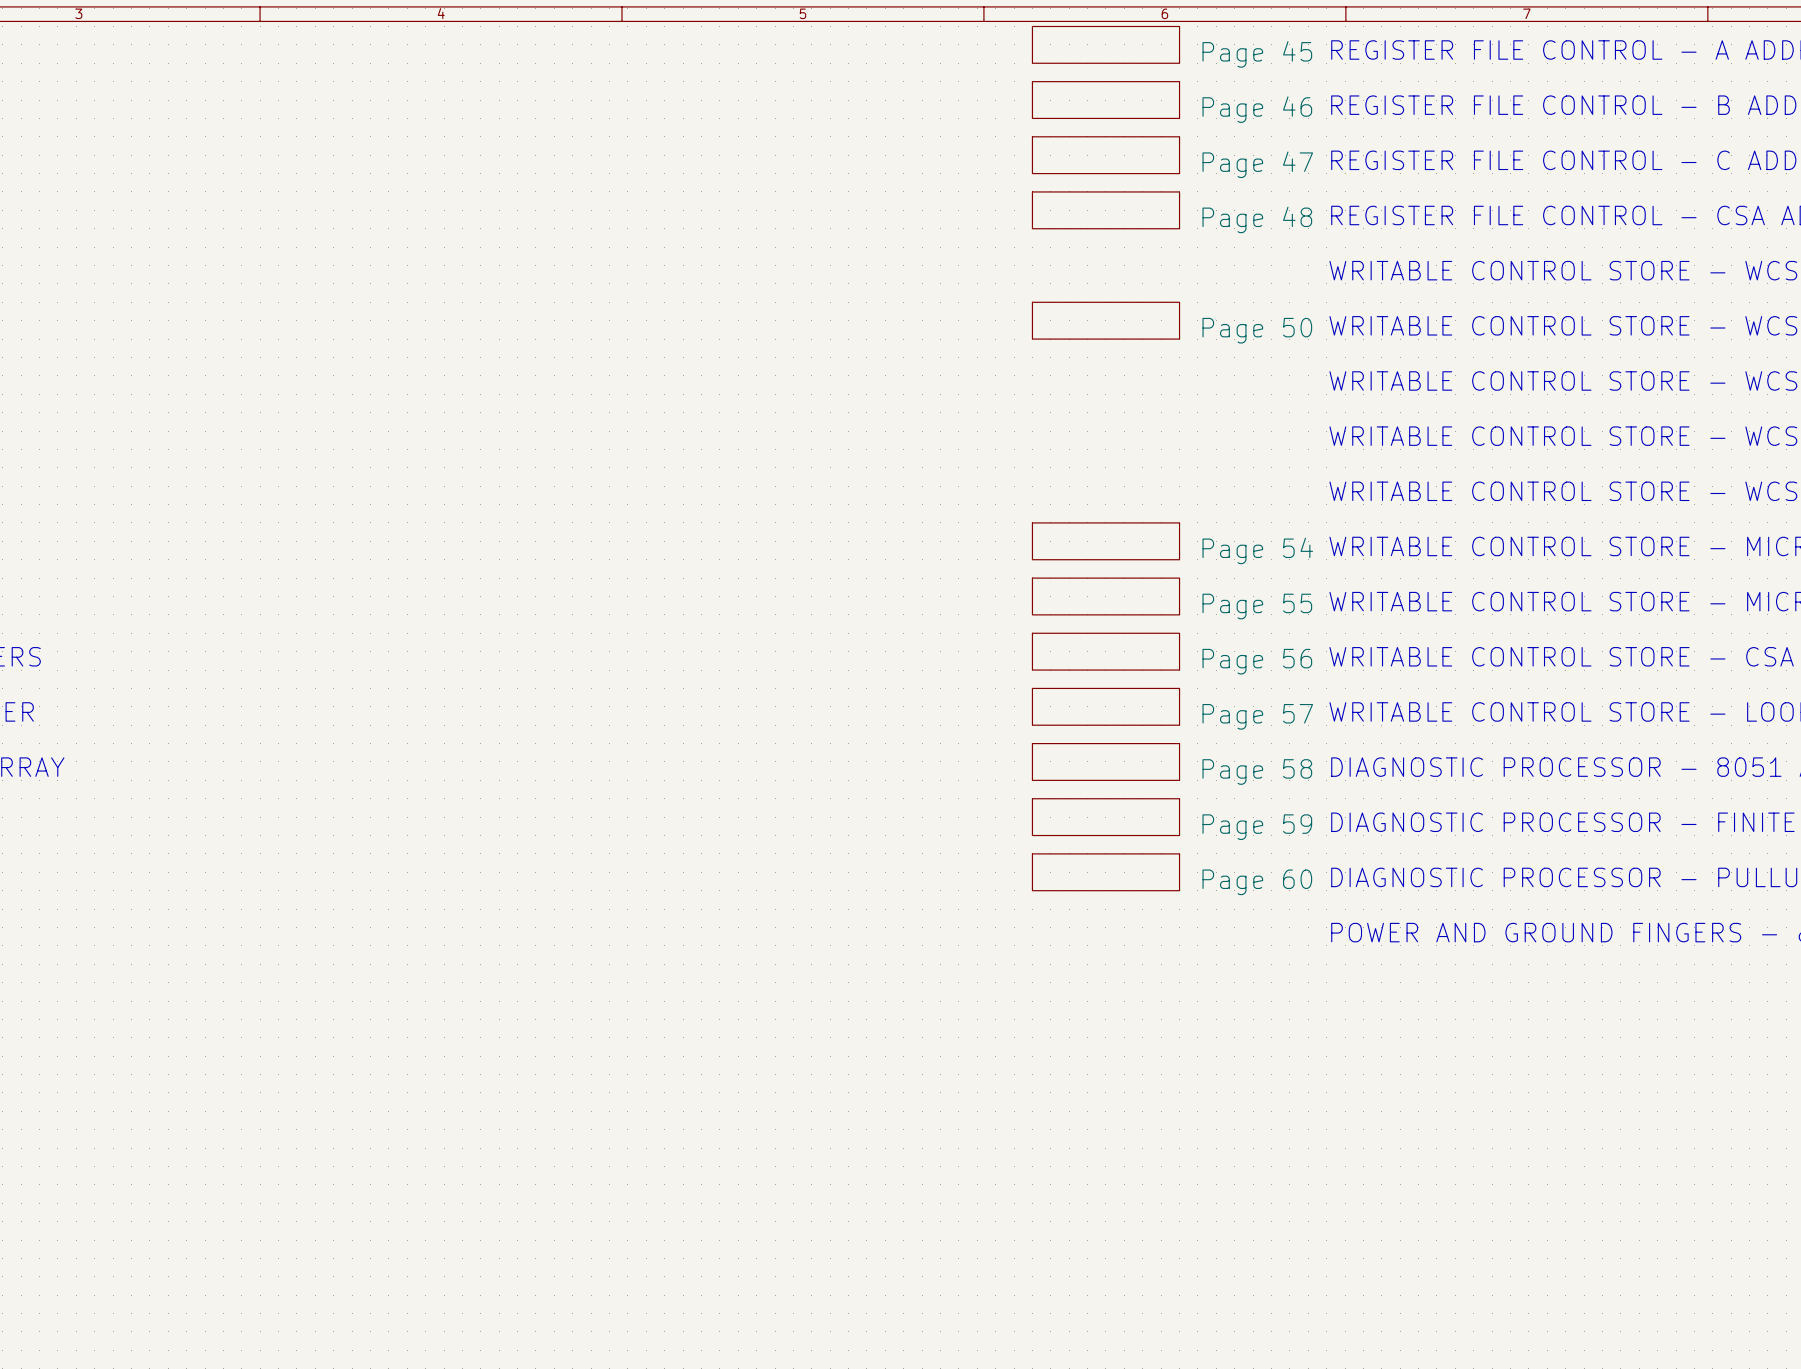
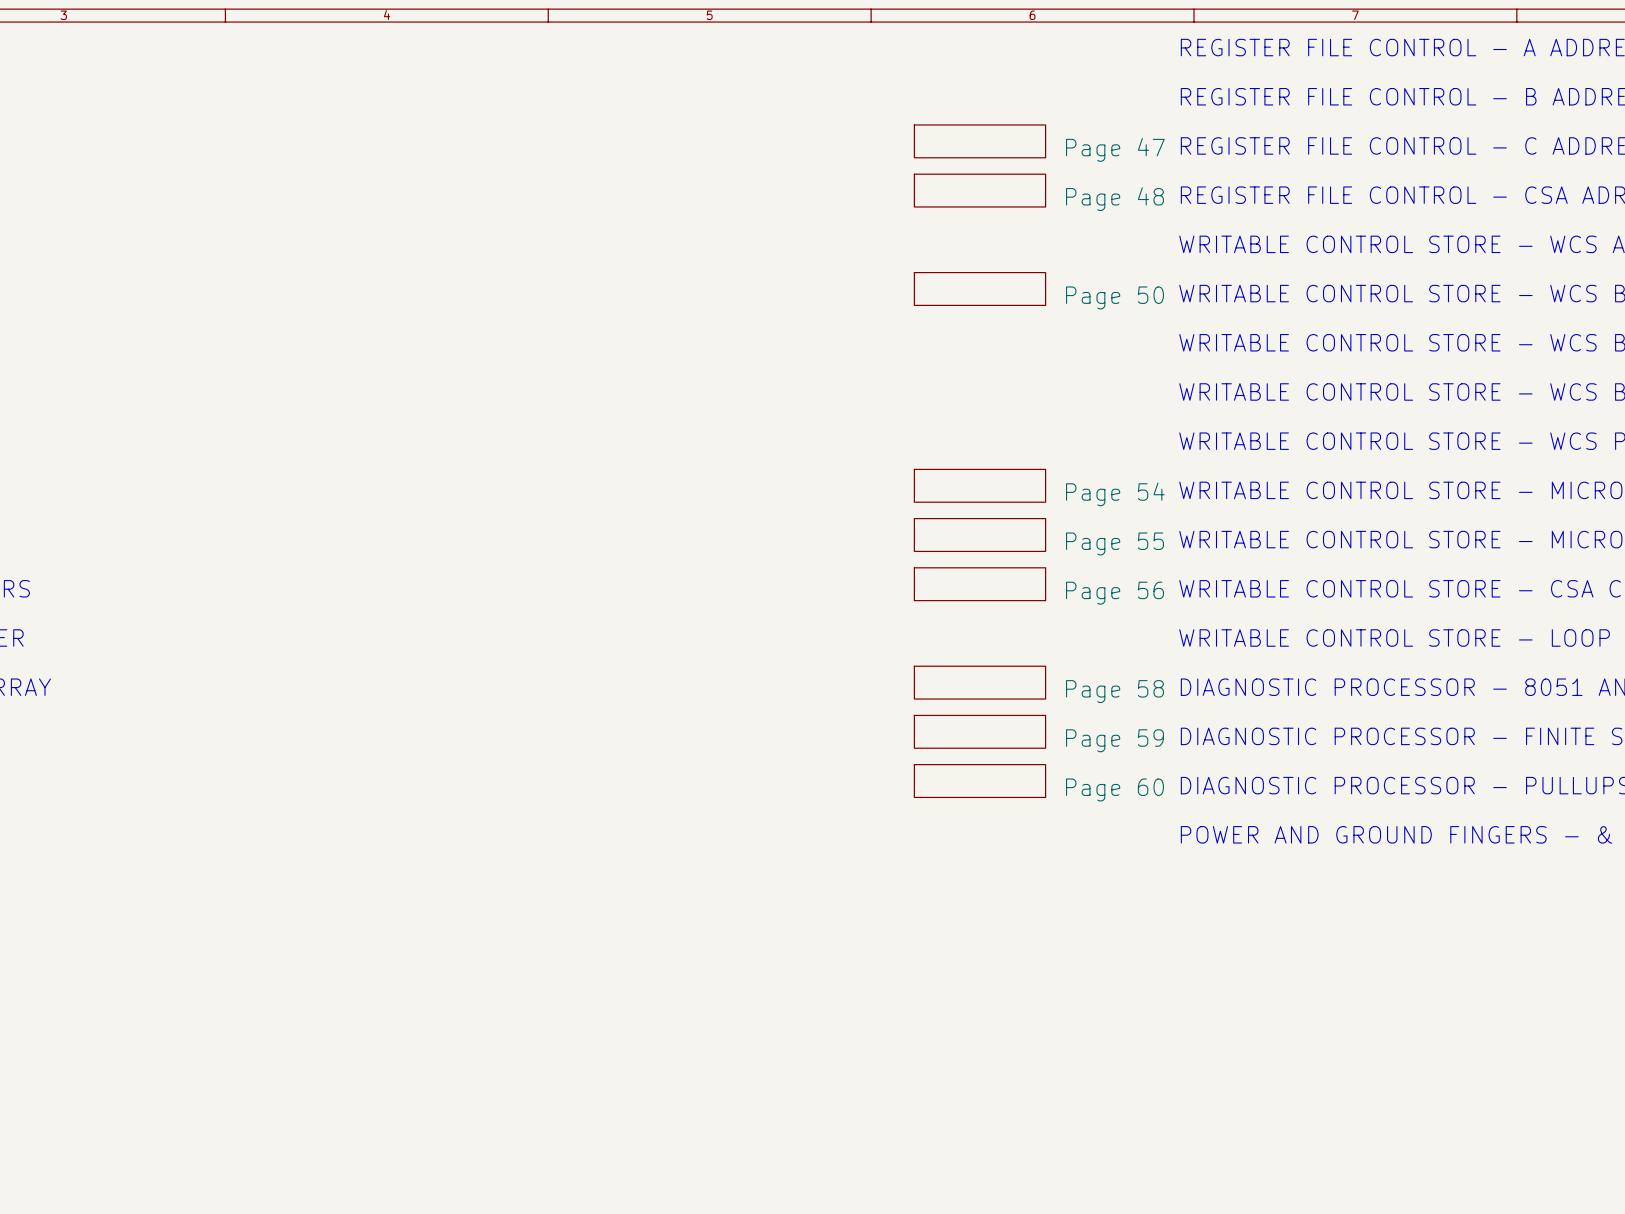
sheet Page 45: (1105, 44) -> none
sheet Page 46: (1105, 100) -> none
sheet Page 57: (1105, 706) -> none

